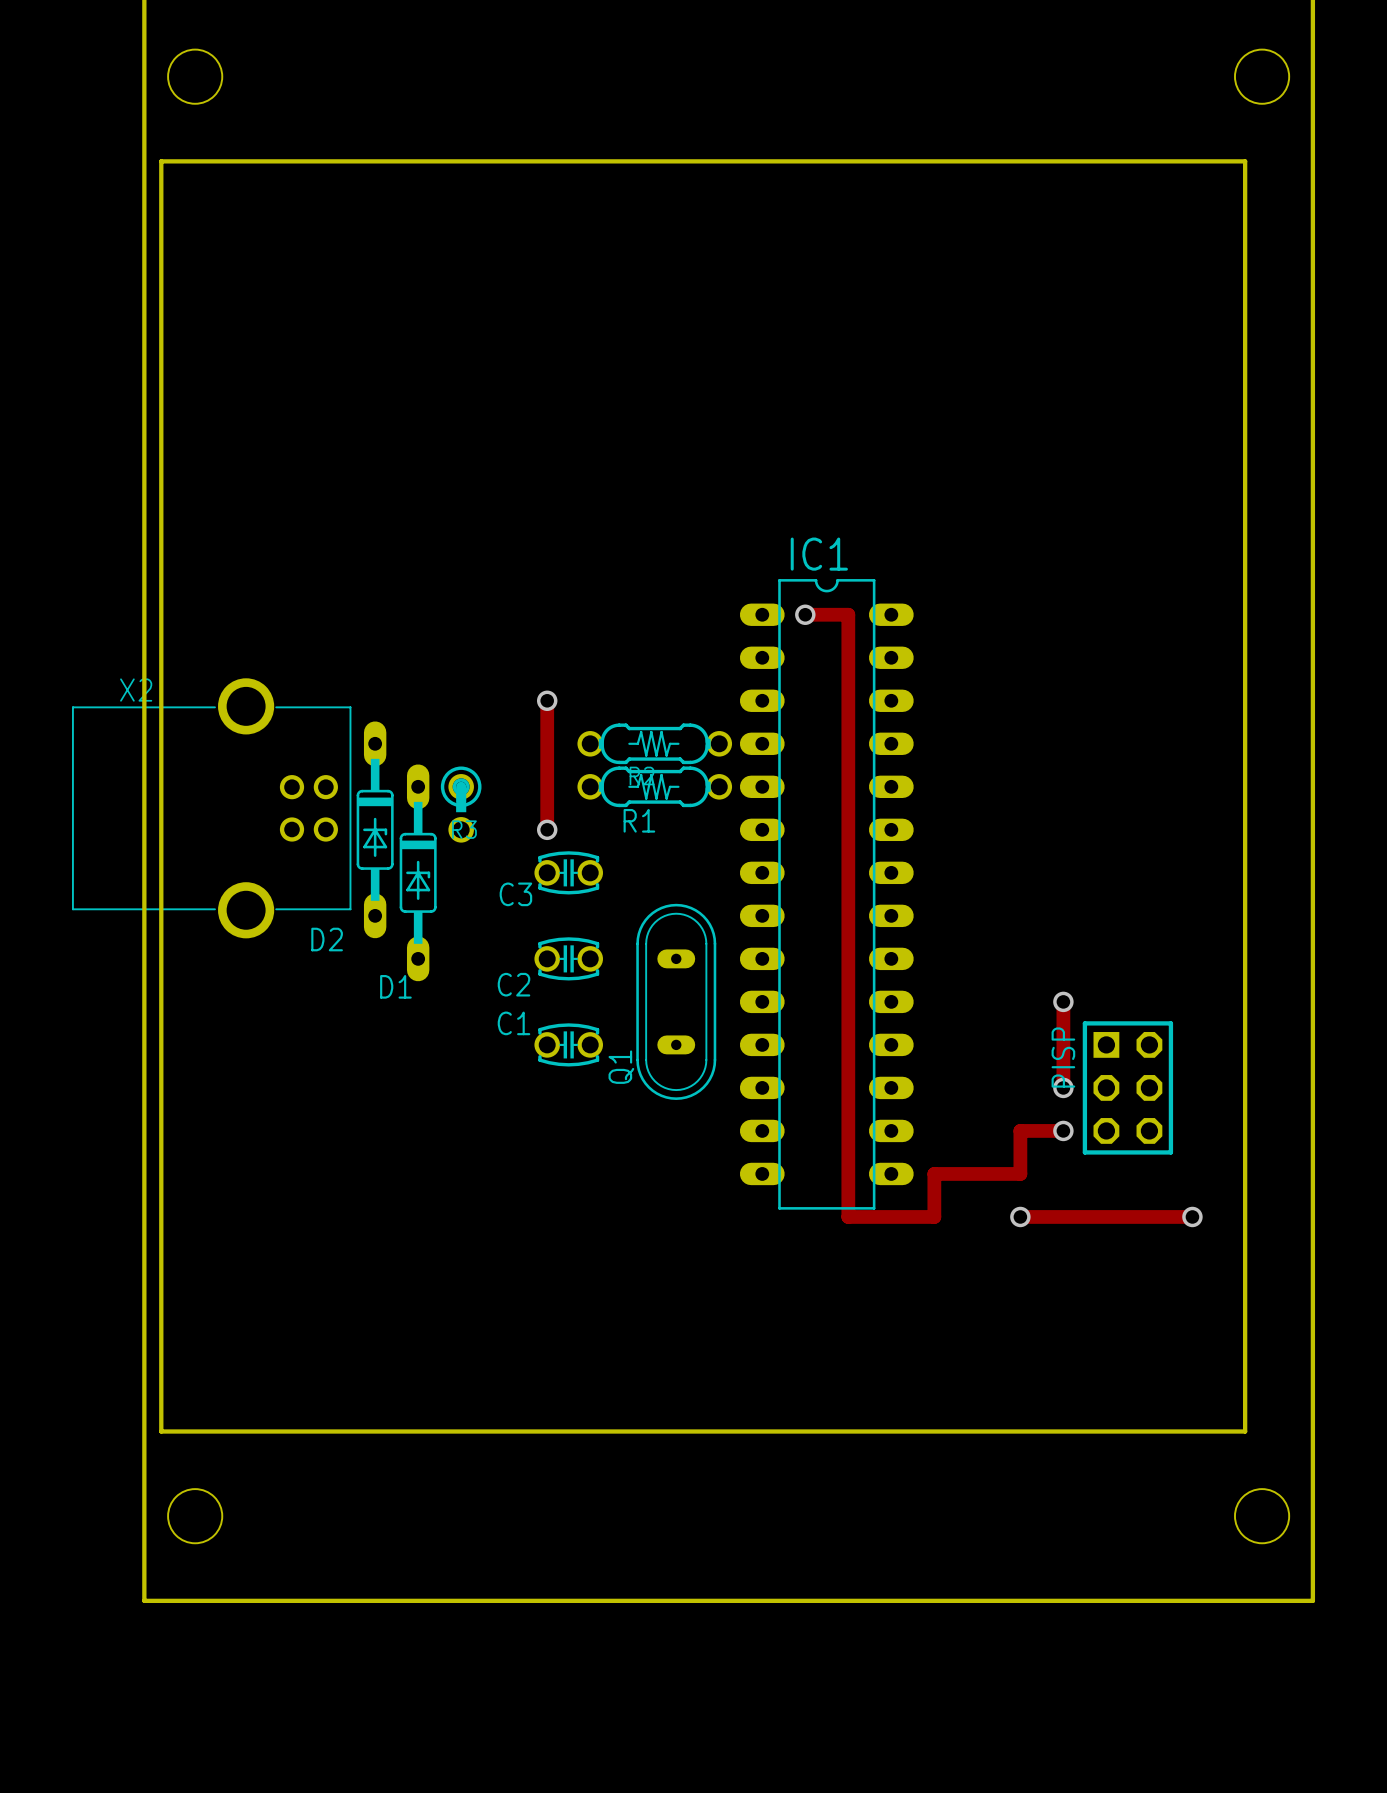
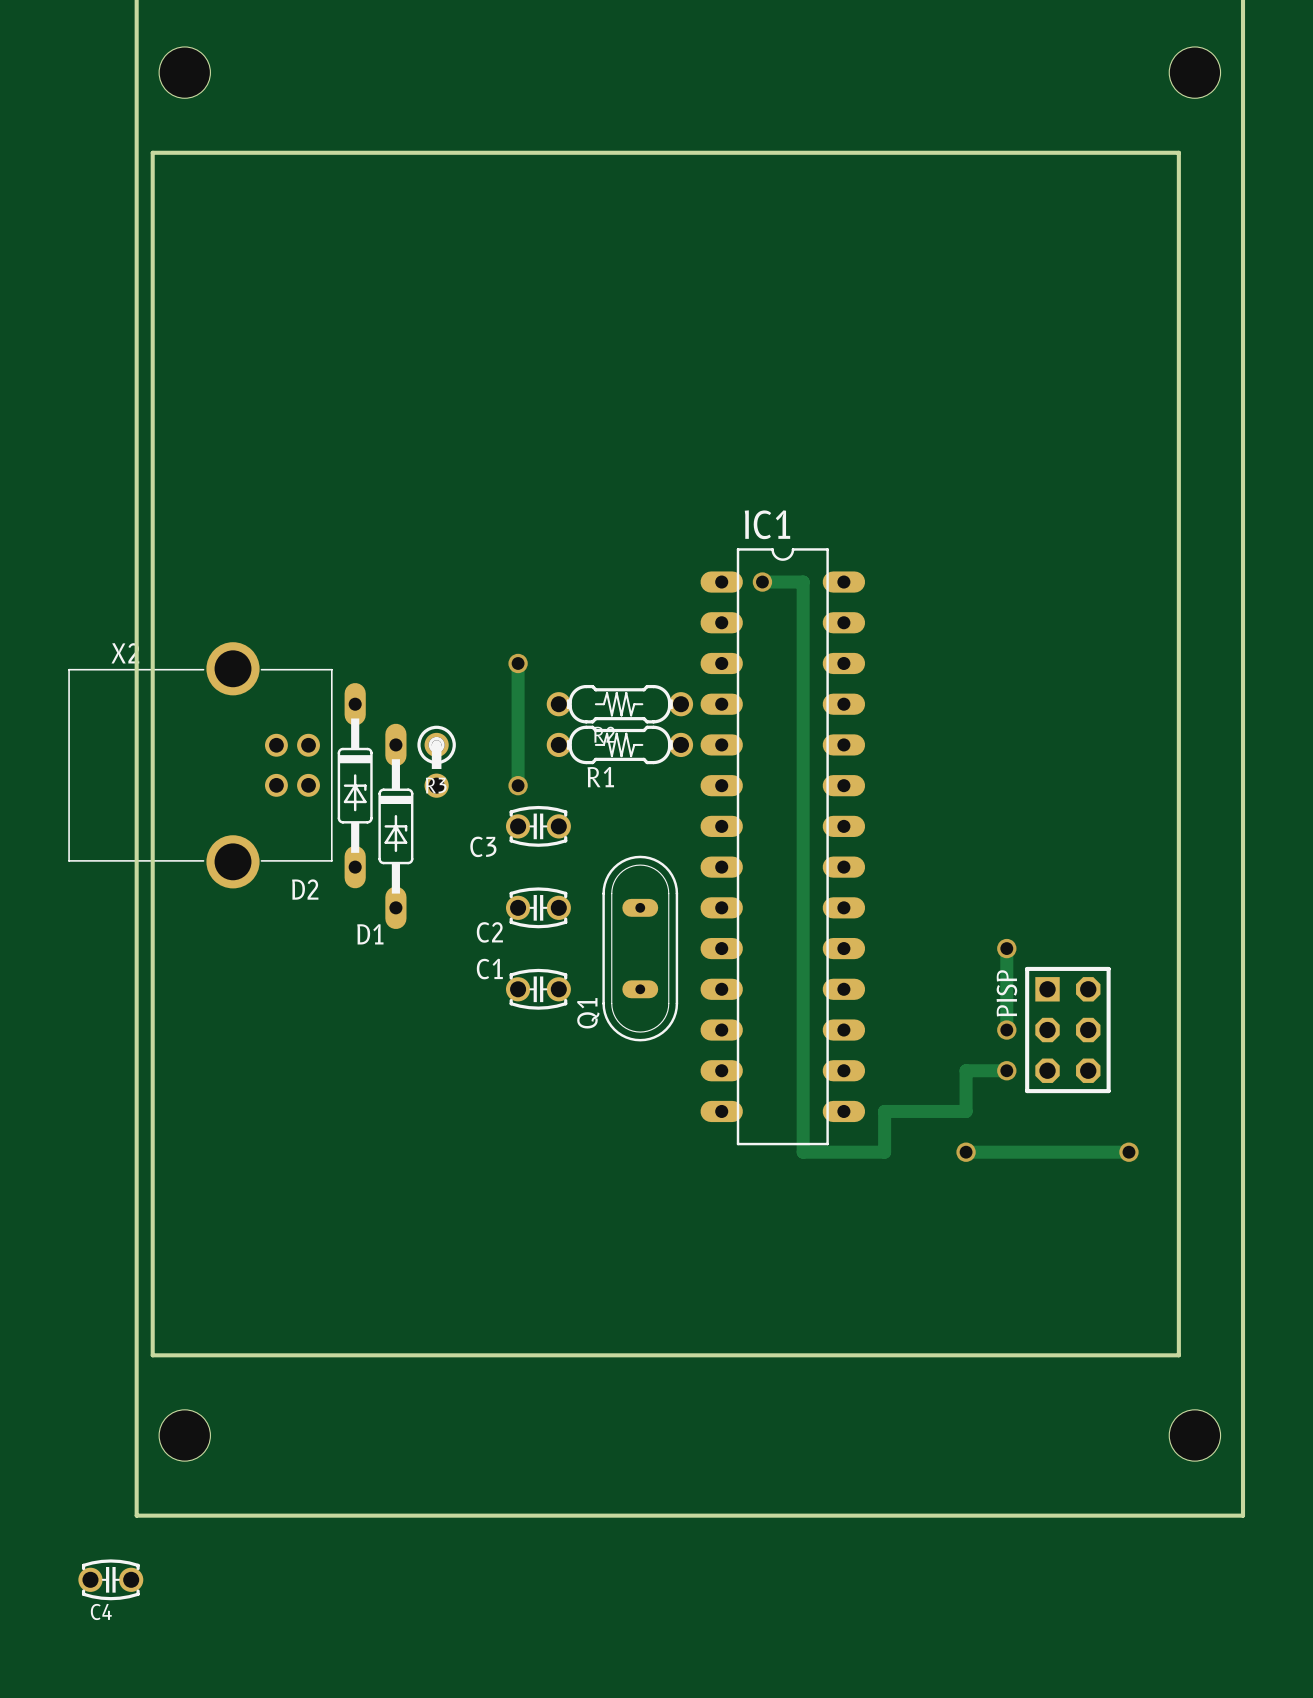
C4: none -> (110, 1579)

